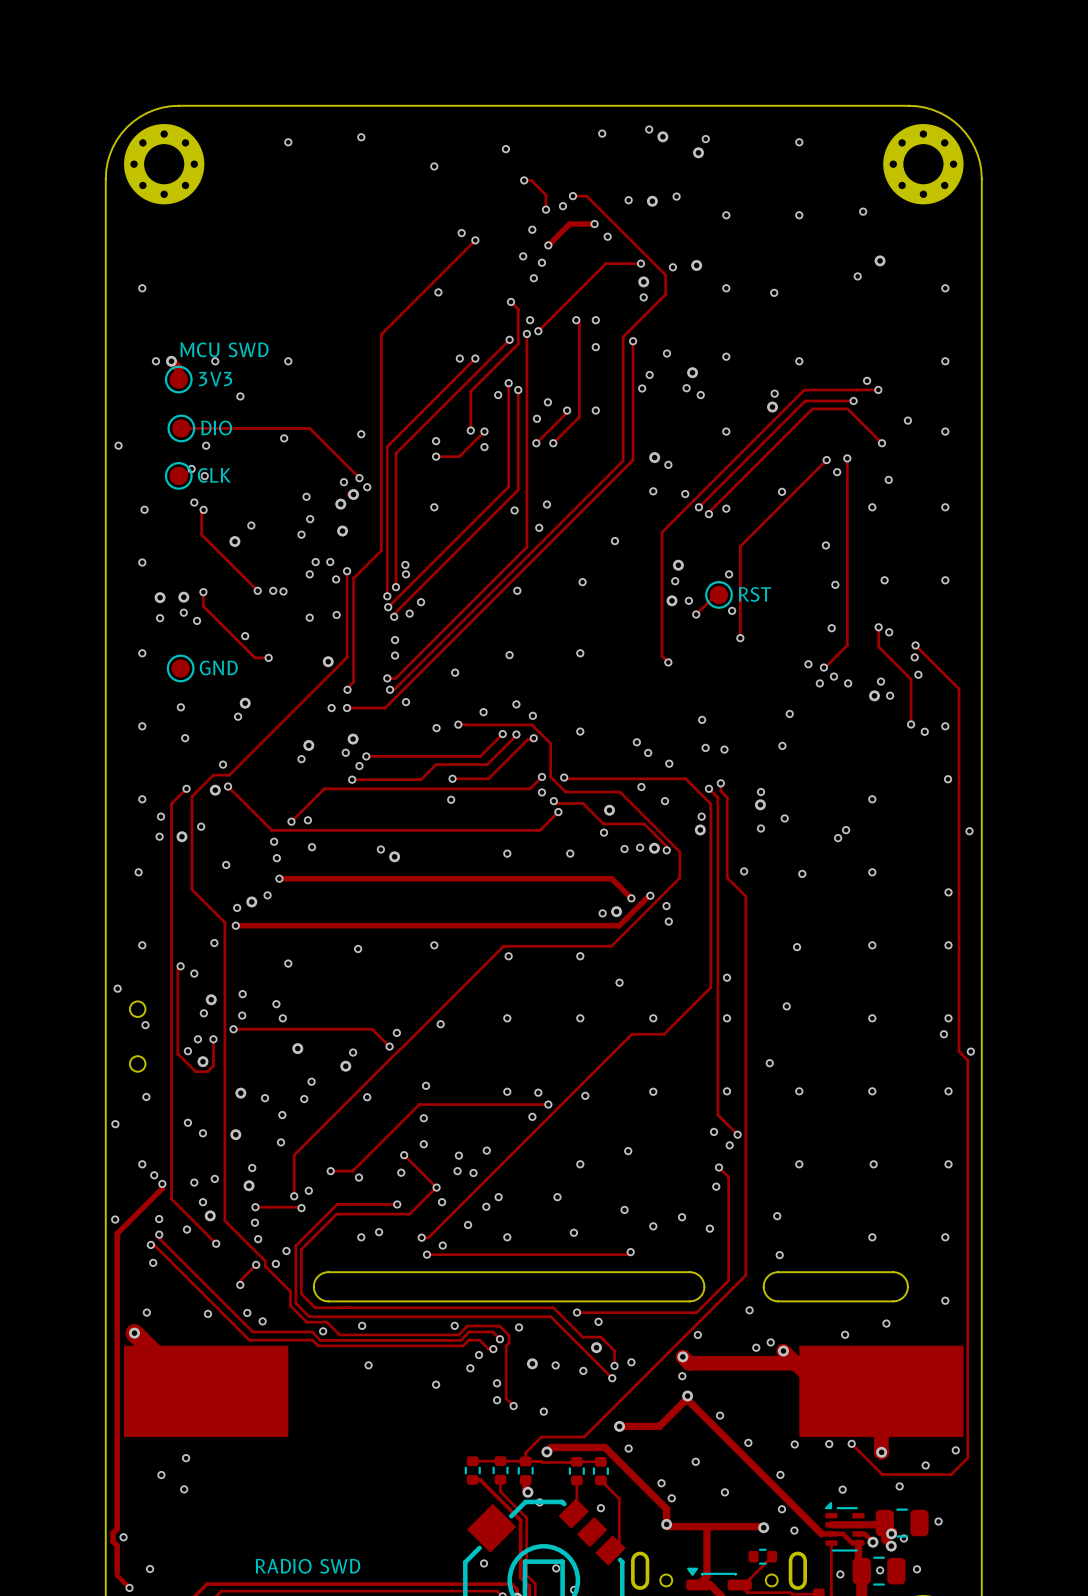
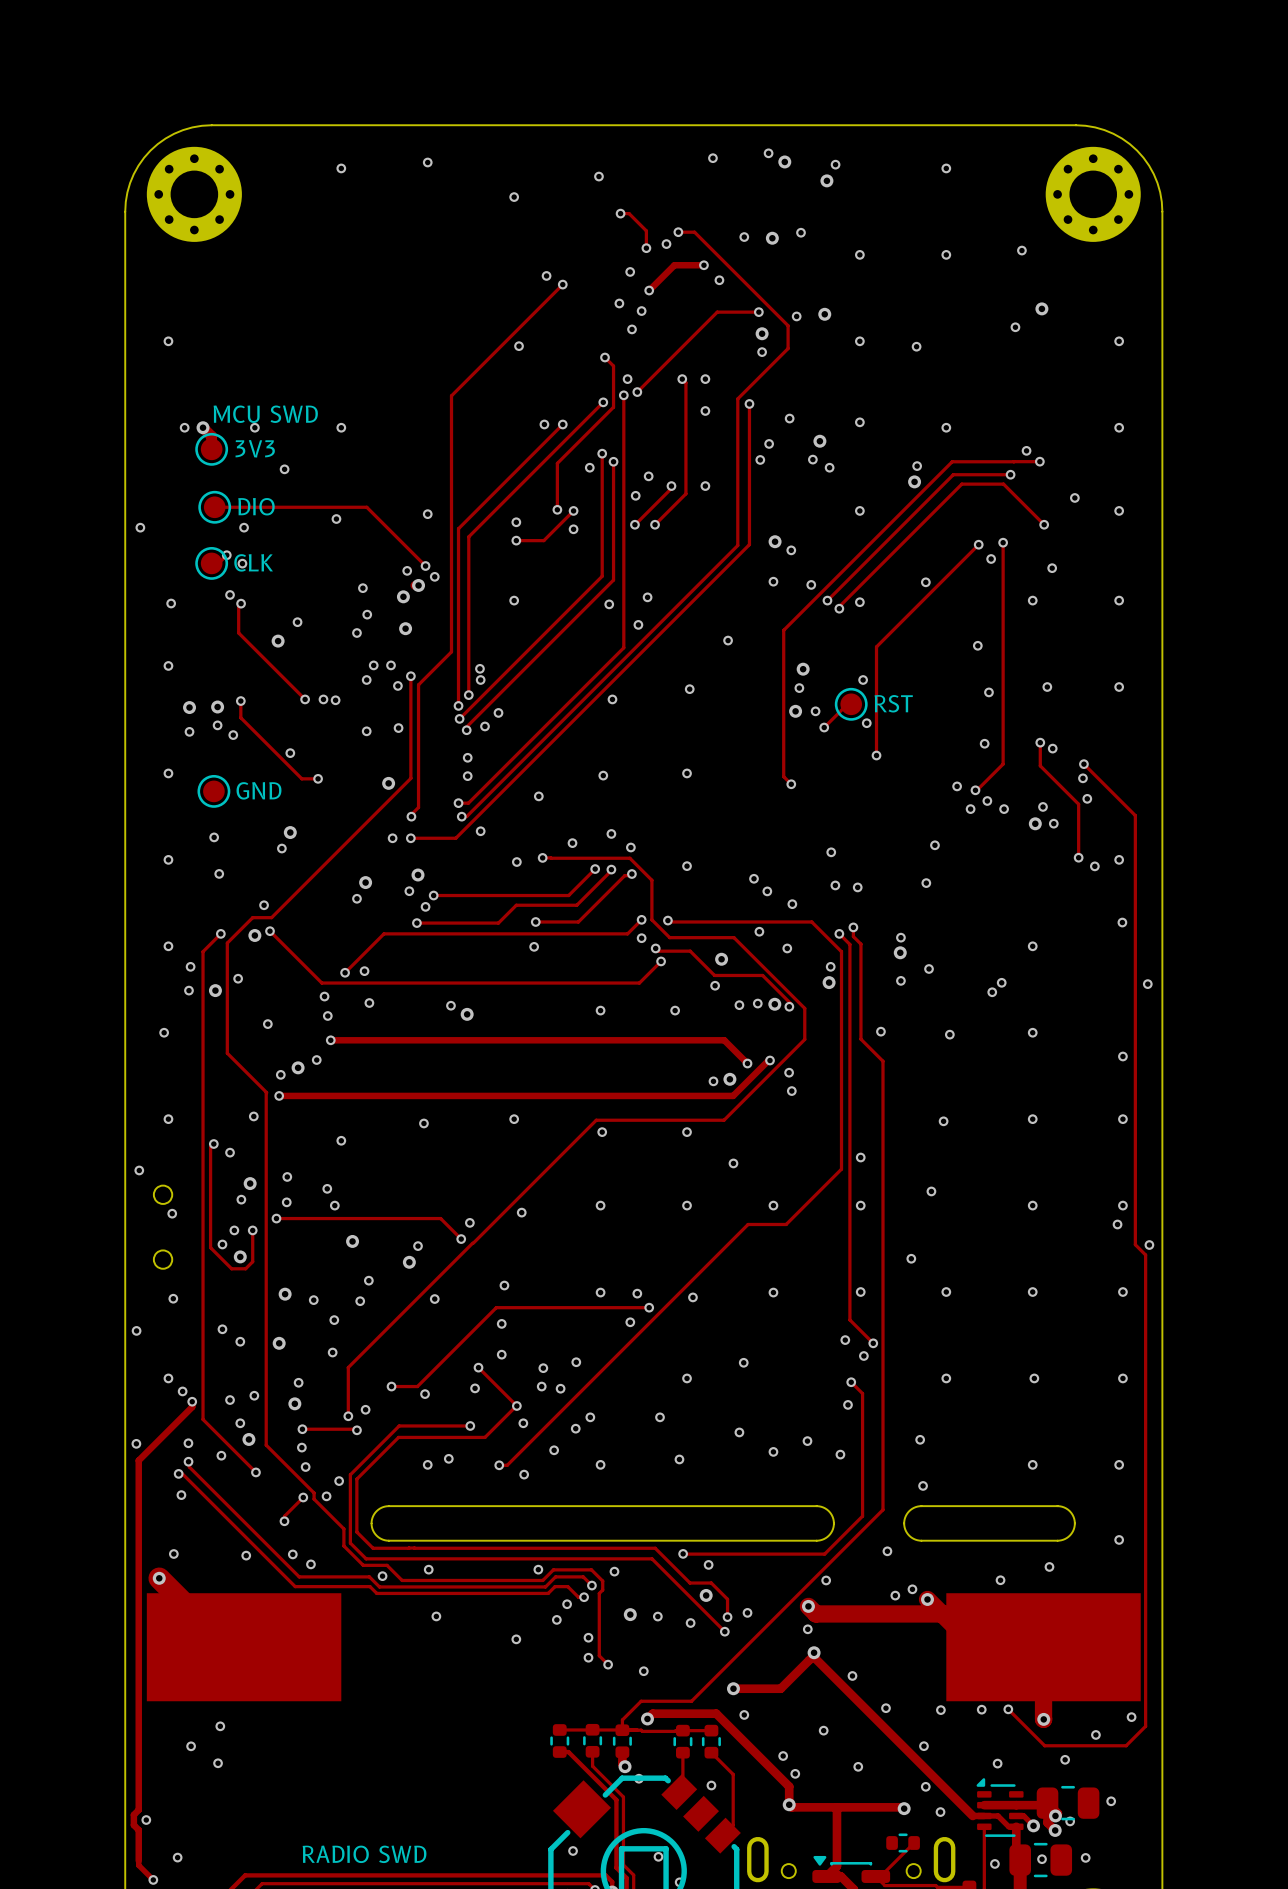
track: (630, 1252) (628, 1254) (426, 1254) -> none
via: (630, 1252) -> none
via: (426, 1254) -> none

